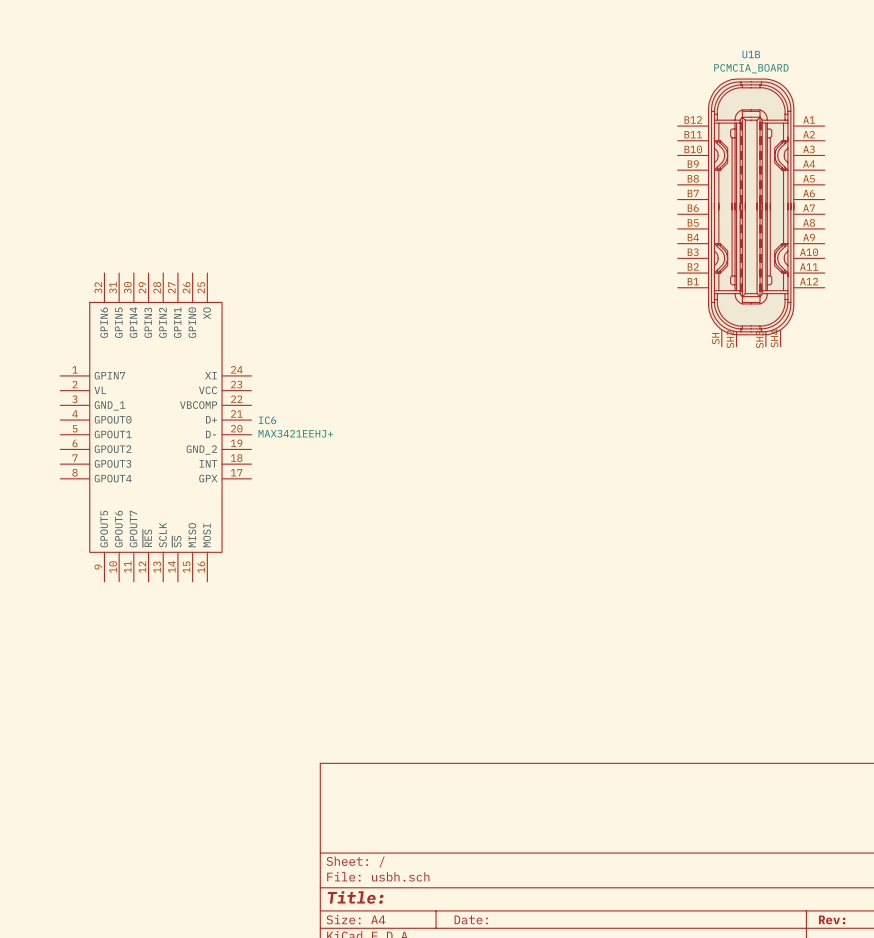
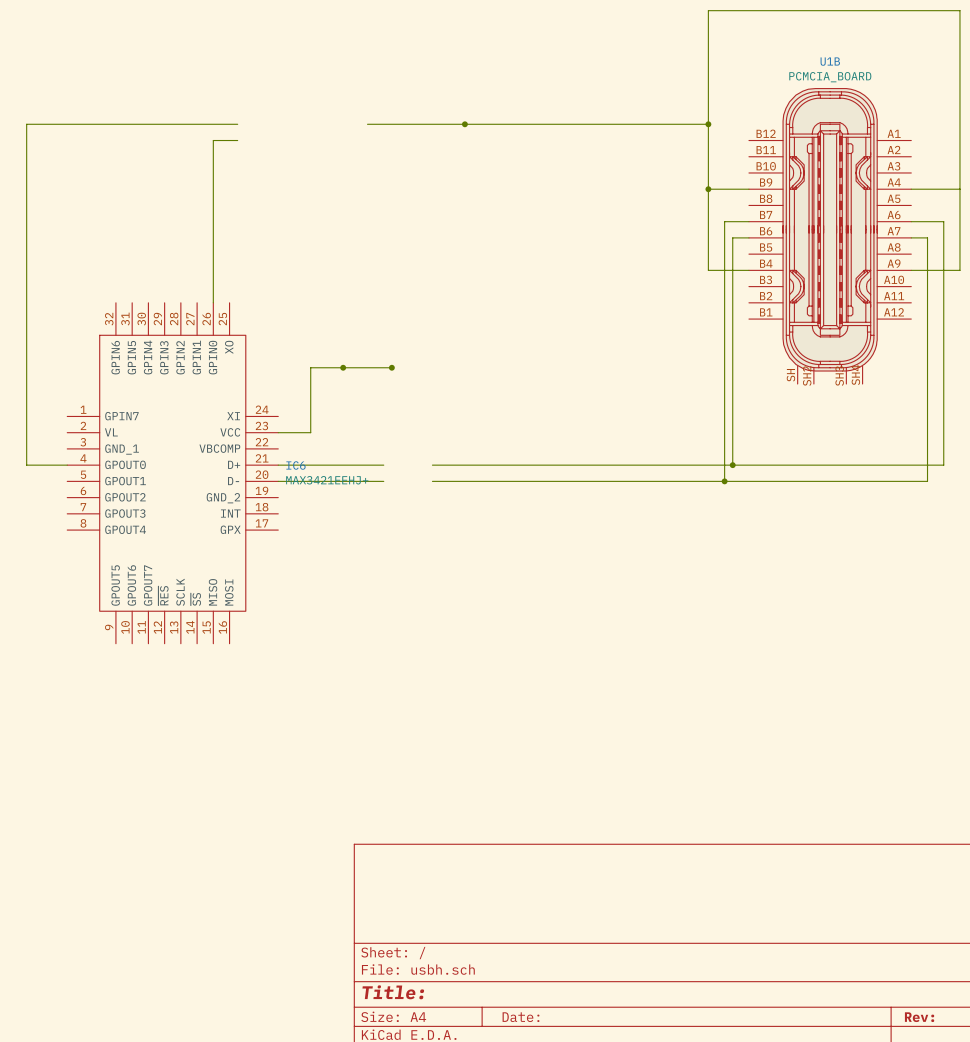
wire: none -> (237, 124) (26, 124) (26, 465) (67, 465)
wire: none -> (367, 124) (708, 124)
junction: none -> (464, 124)
junction: none -> (708, 124)
wire: none -> (237, 140) (213, 140) (213, 302)
wire: none -> (708, 189) (748, 189)
junction: none -> (708, 189)
wire: none -> (911, 189) (959, 189)
wire: none -> (748, 221) (724, 221) (724, 481)
wire: none -> (911, 221) (943, 221) (943, 465) (432, 465)
wire: none -> (748, 237) (732, 237) (732, 465)
wire: none -> (911, 237) (927, 237) (927, 481) (432, 481)
wire: none -> (748, 270) (708, 270) (708, 10) (959, 10) (959, 270) (911, 270)
junction: none -> (343, 367)
wire: none -> (391, 367) (310, 367) (310, 432) (278, 432)
junction: none -> (391, 367)
wire: none -> (278, 465) (383, 465)
junction: none -> (732, 465)
wire: none -> (278, 481) (383, 481)
junction: none -> (724, 481)

